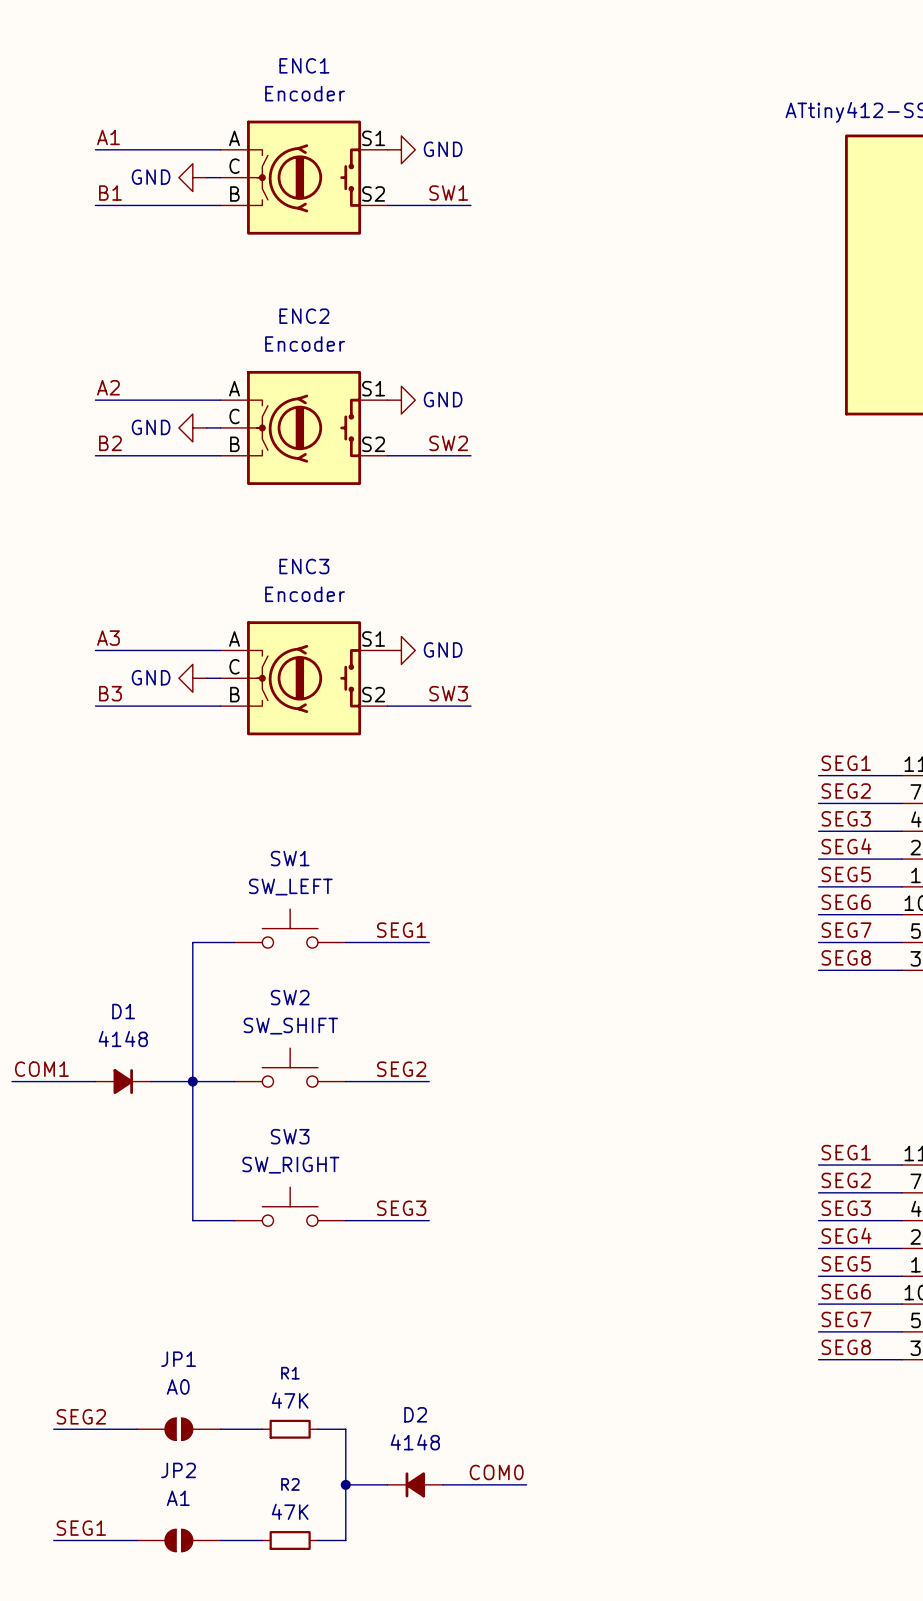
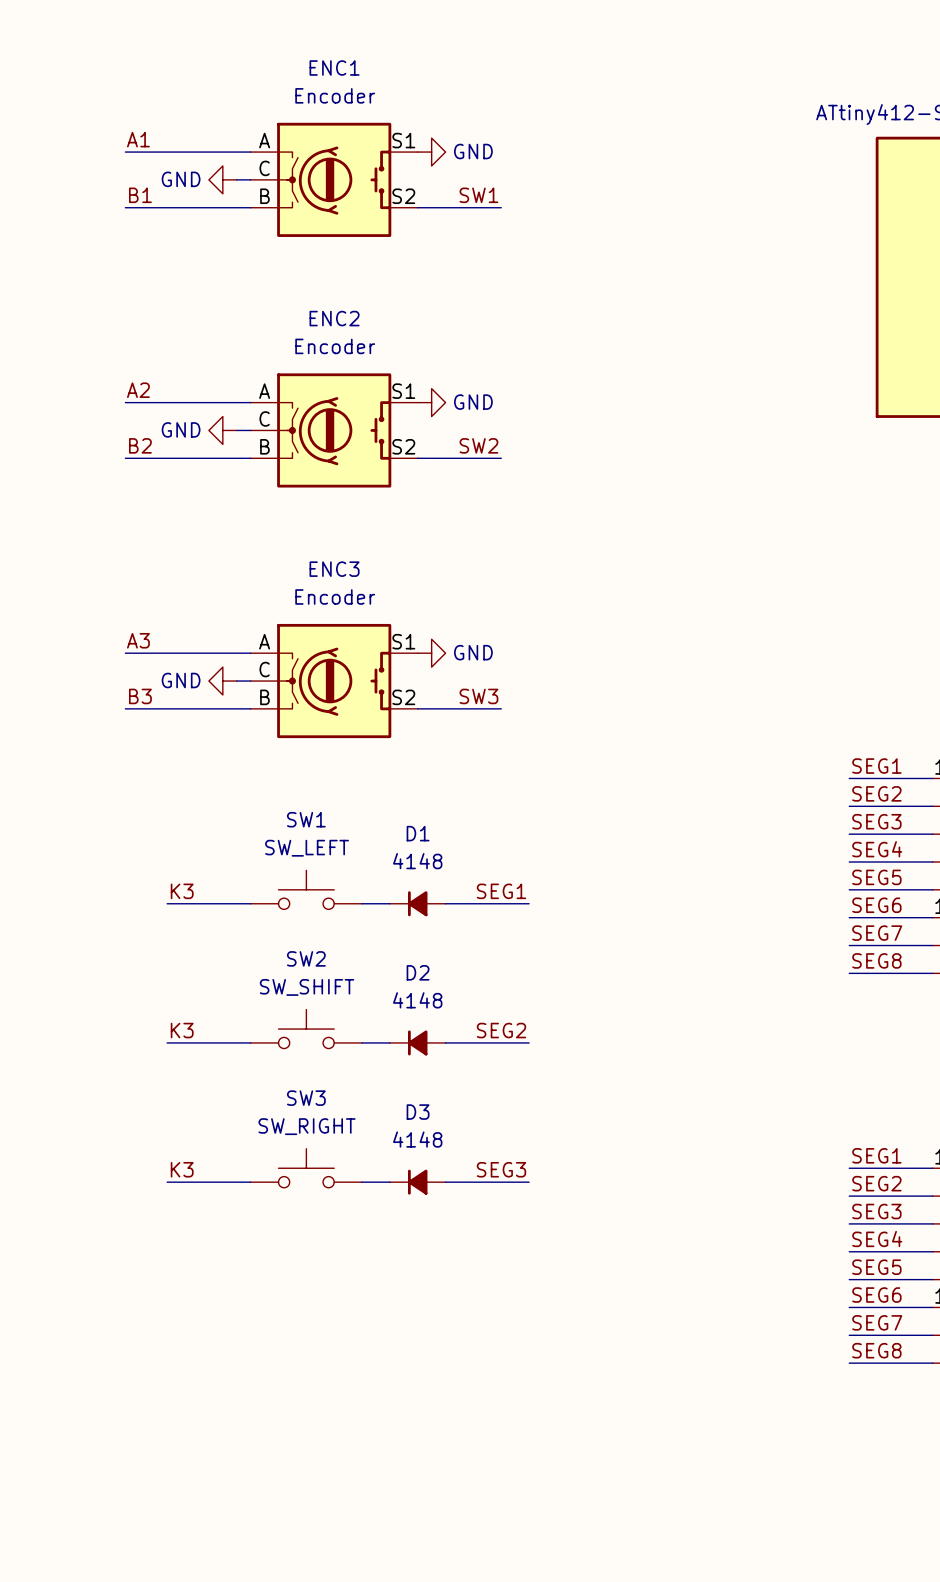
label: none -> K3 (182, 891)
wire: none -> (167, 903) (250, 903)
wire: none -> (362, 903) (389, 903)
SW1 position: (290, 928) -> (306, 889)
label position: SEG1 (401, 930) -> SEG1 (501, 891)
wire: (234, 942) (192, 942) (192, 1220) (234, 1220) -> none
wire: (345, 942) (429, 942) -> (445, 903) (529, 903)
label: none -> K3 (182, 1030)
wire: none -> (362, 1042) (389, 1042)
SW2 position: (290, 1067) -> (306, 1029)
label: COM1 (41, 1069) -> none
label position: SEG2 (401, 1069) -> SEG2 (501, 1030)
wire: (12, 1081) (95, 1081) -> (167, 1182) (250, 1182)
D1 rotation: 0° (123, 1081) -> 180° (417, 903)
D1 position: (123, 1081) -> (417, 903)
wire: (151, 1081) (234, 1081) -> (167, 1042) (250, 1042)
junction: (192, 1081) -> none
wire: (345, 1081) (429, 1081) -> (445, 1042) (529, 1042)
label: none -> K3 (182, 1169)
wire: none -> (362, 1182) (389, 1182)
D3: none -> 4148 (417, 1182)
SW3 position: (290, 1206) -> (306, 1168)
label position: SEG3 (401, 1208) -> SEG3 (501, 1169)
wire: (345, 1220) (429, 1220) -> (445, 1182) (529, 1182)
label: SEG2 (81, 1416) -> none
wire: (53, 1429) (137, 1429) -> none
JP1: A0 (178, 1429) -> none
wire: (220, 1429) (262, 1429) -> none
R1: 47K (290, 1429) -> none
wire: (317, 1429) (345, 1429) (345, 1540) (317, 1540) -> none
label: COM0 (496, 1472) -> none
wire: (345, 1484) (387, 1484) -> none
junction: (345, 1484) -> none
D2 position: (415, 1484) -> (417, 1042)
wire: (443, 1484) (526, 1484) -> none
label: SEG1 (81, 1528) -> none
wire: (53, 1540) (137, 1540) -> none
JP2: A1 (178, 1540) -> none
wire: (220, 1540) (262, 1540) -> none
R2: 47K (290, 1540) -> none

